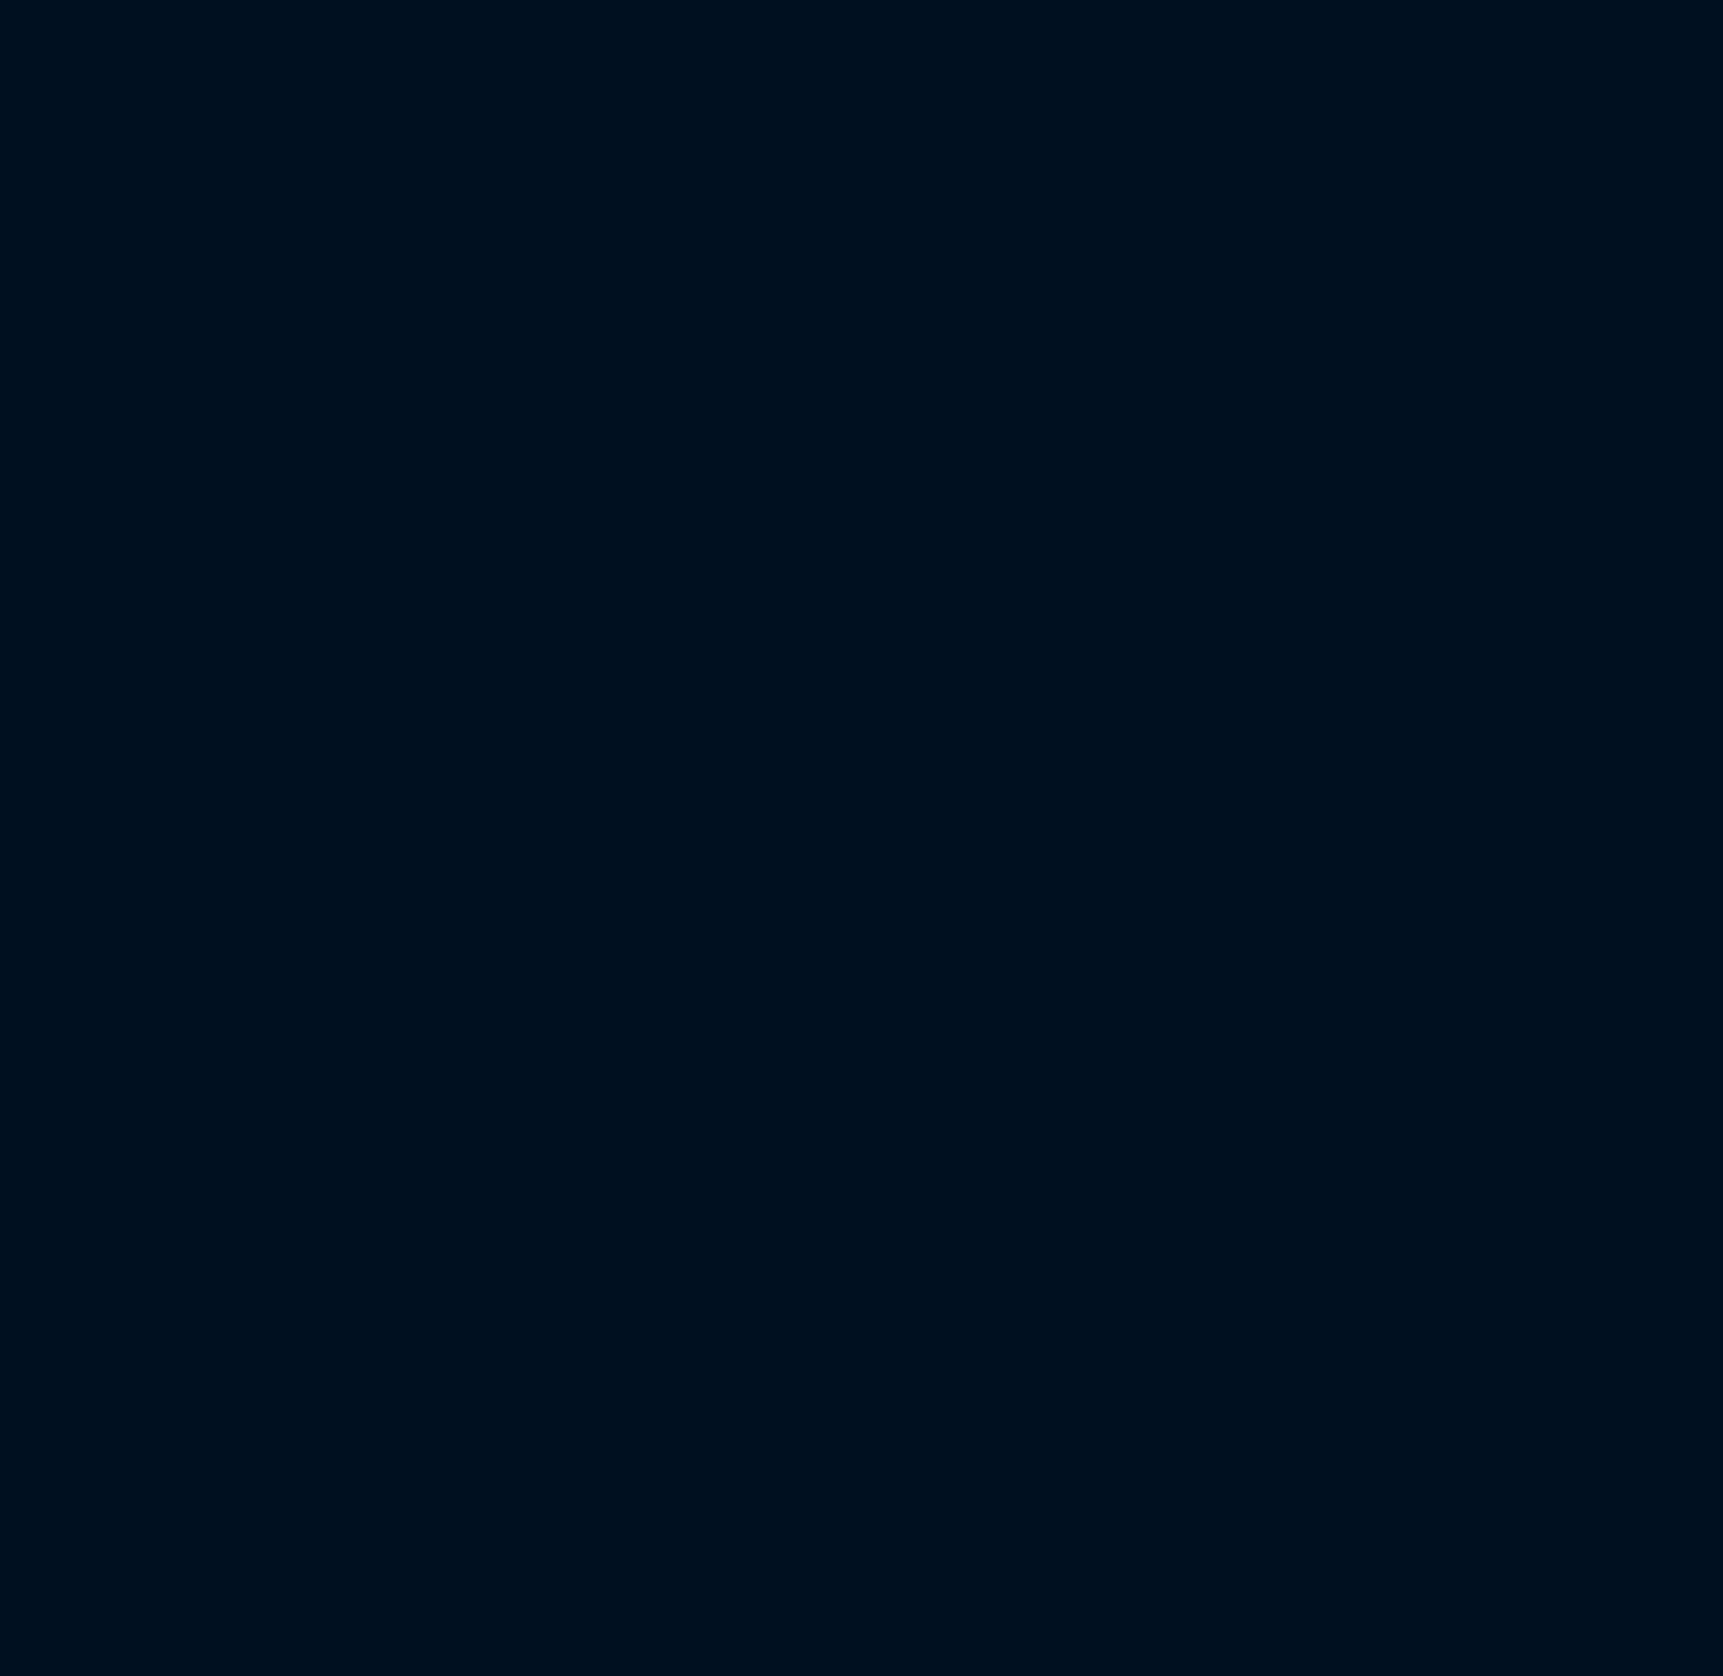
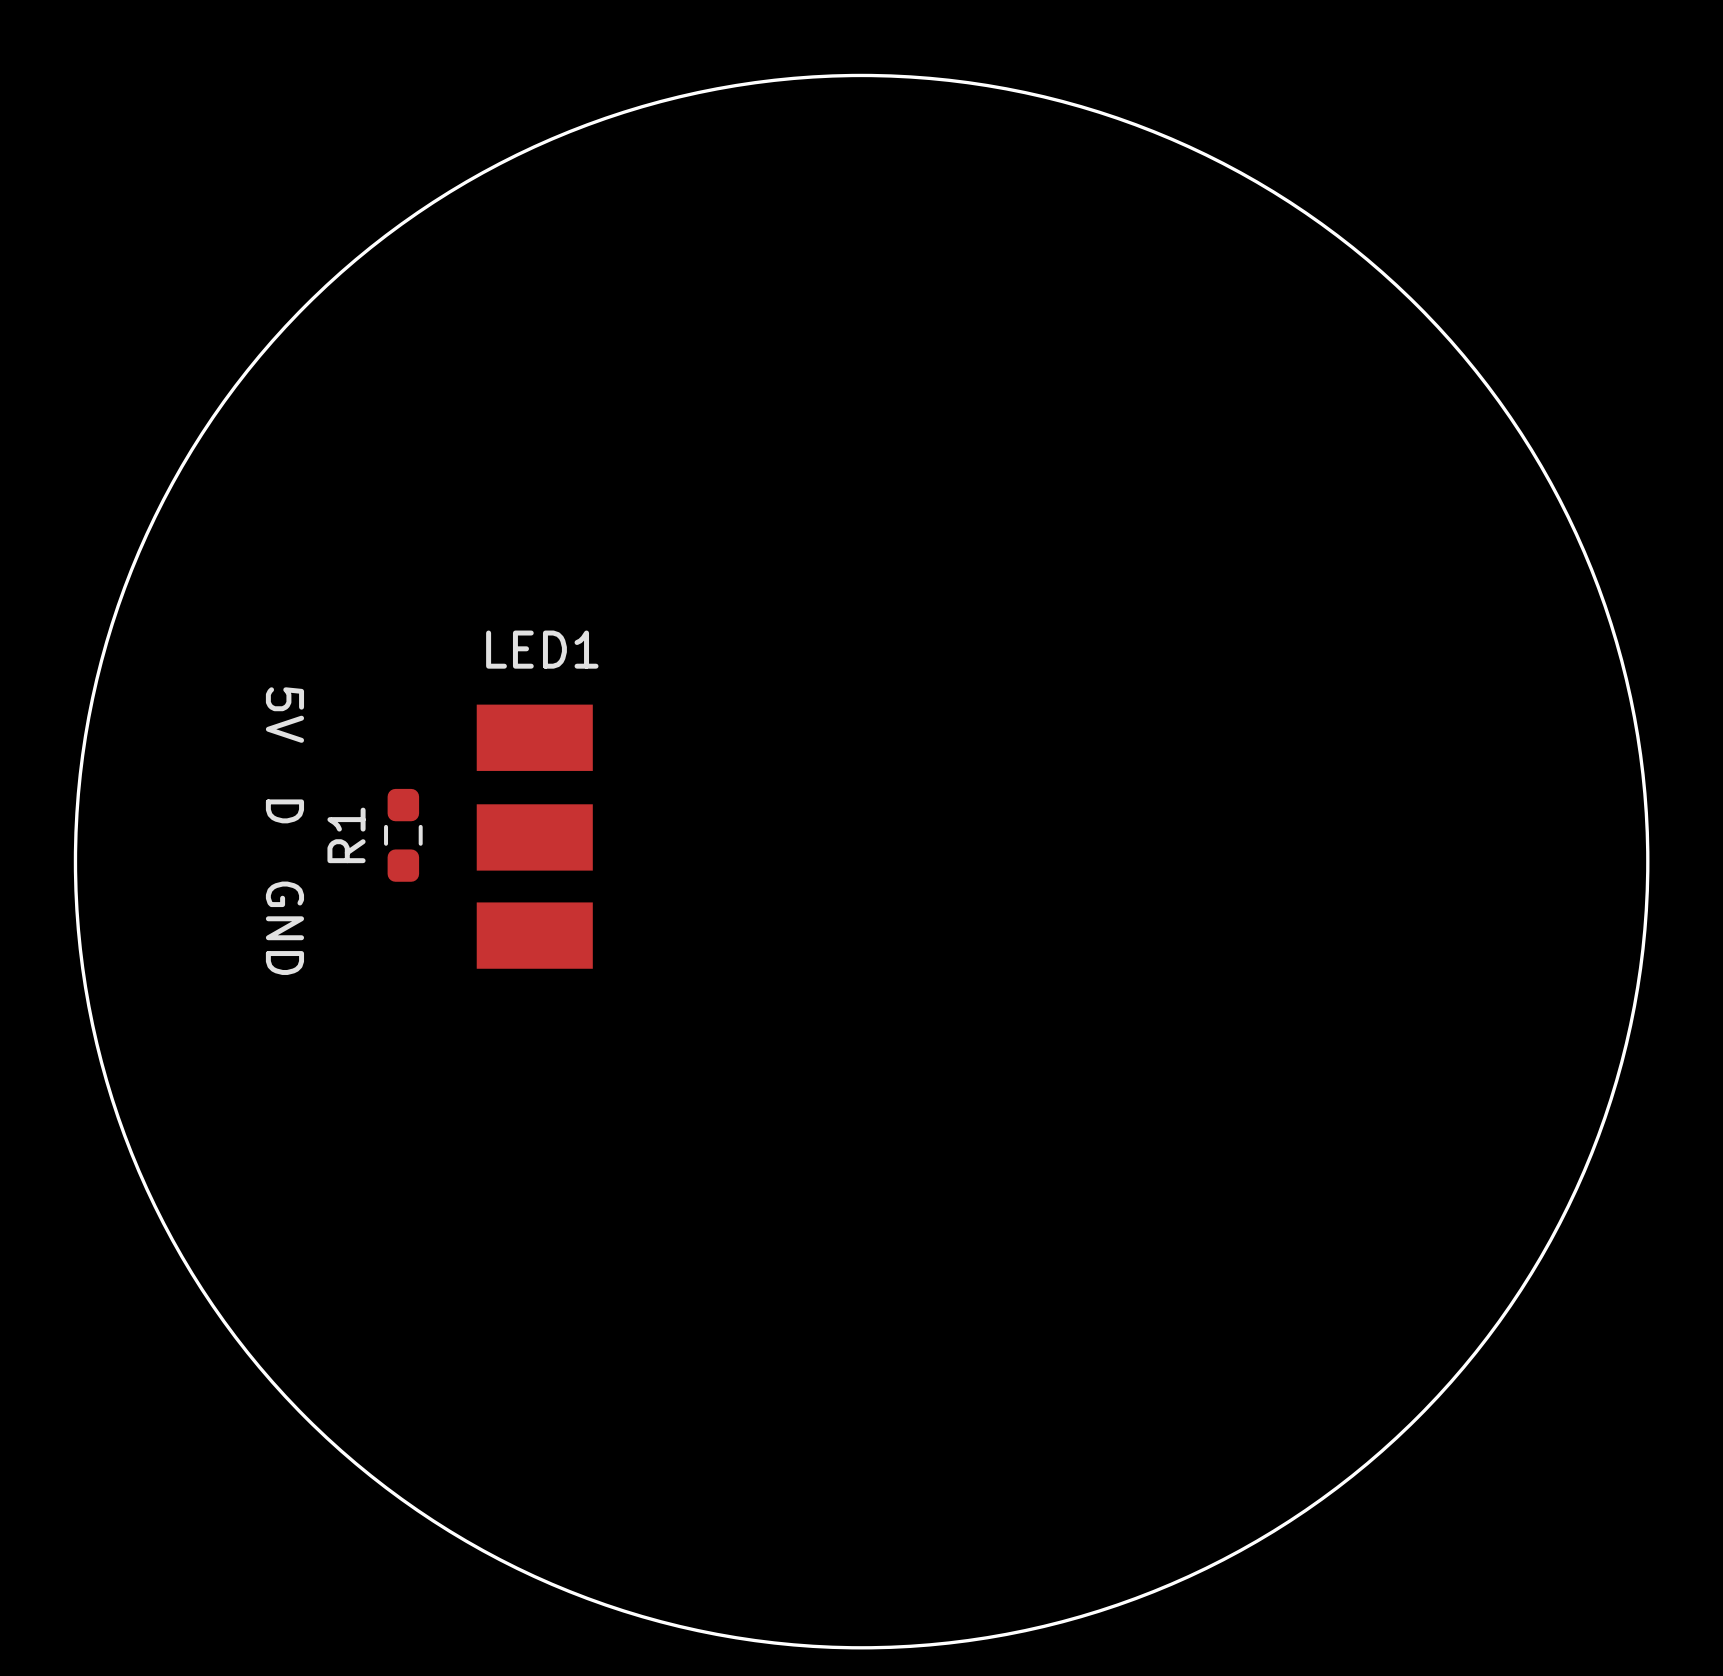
round board edge: none -> [73, 73, 1650, 1650]
text: none -> 5V D GND (284, 831)
R1: none -> (403, 835)
LED1: none -> (534, 836)

